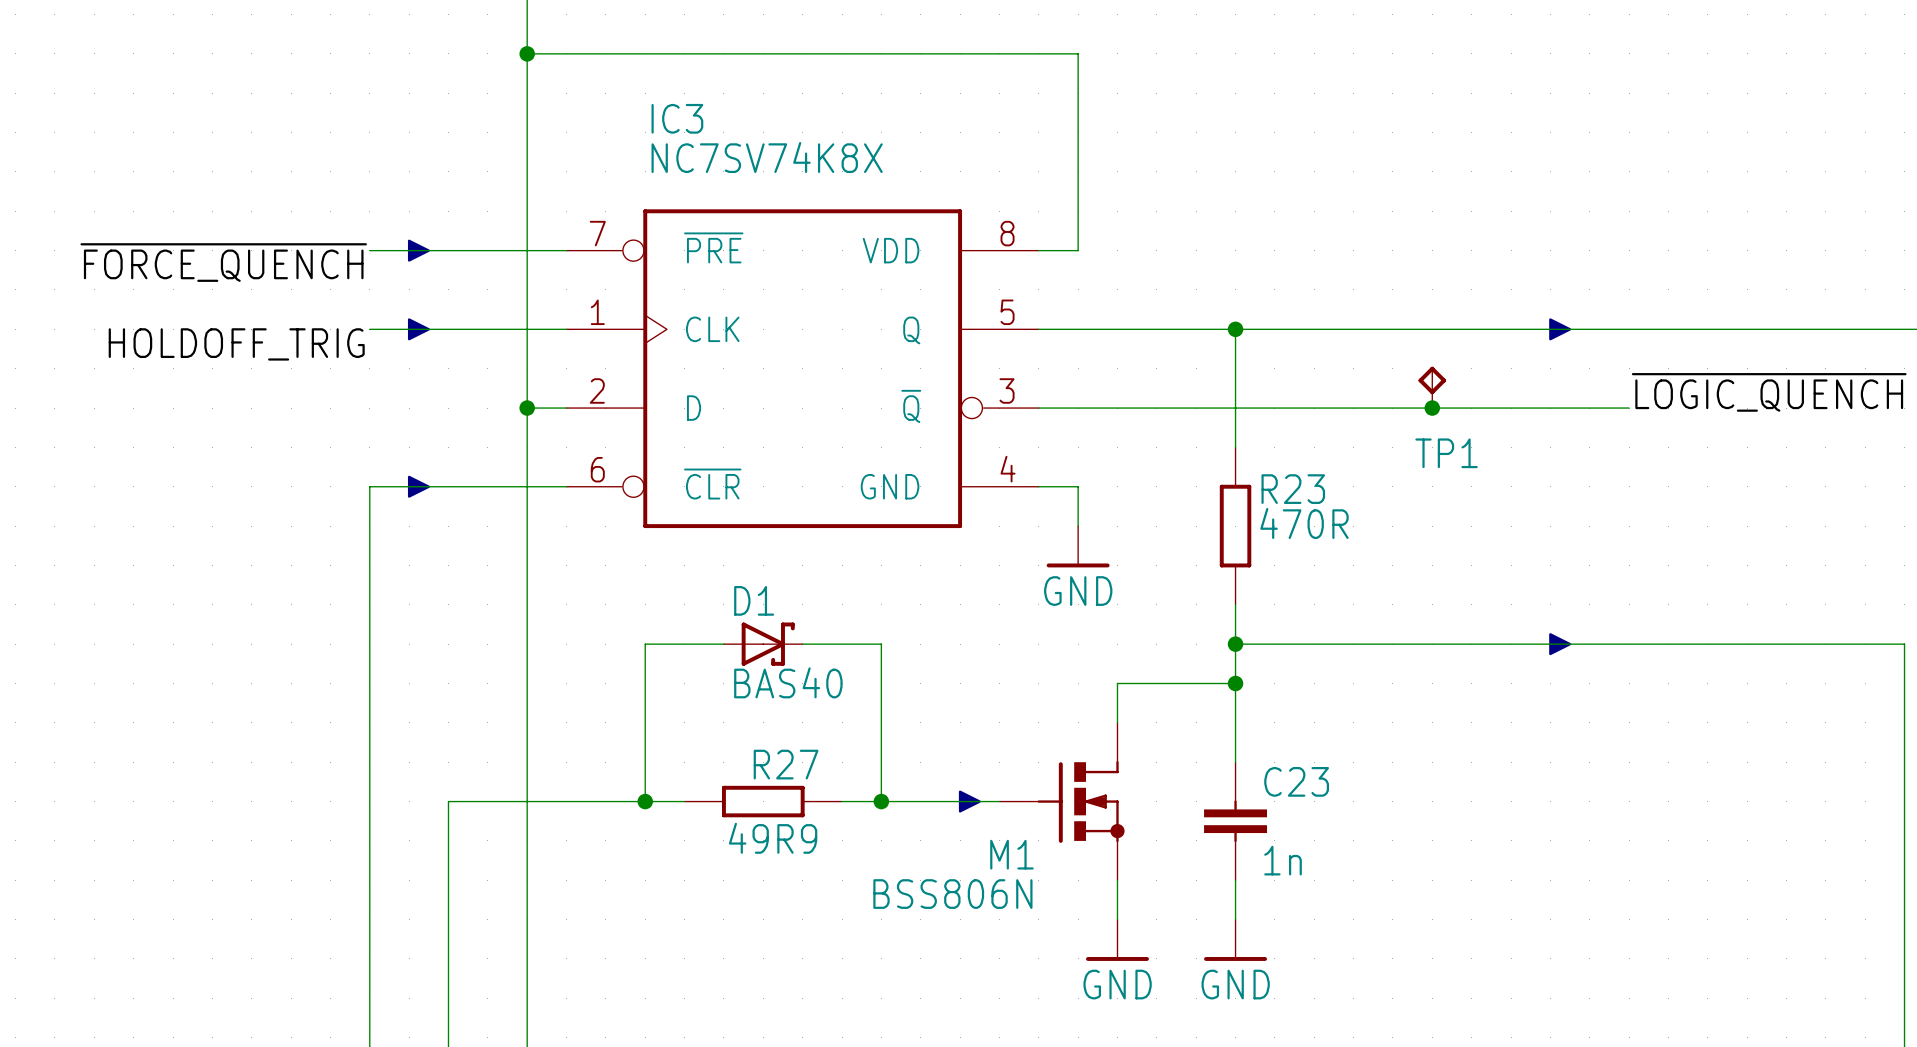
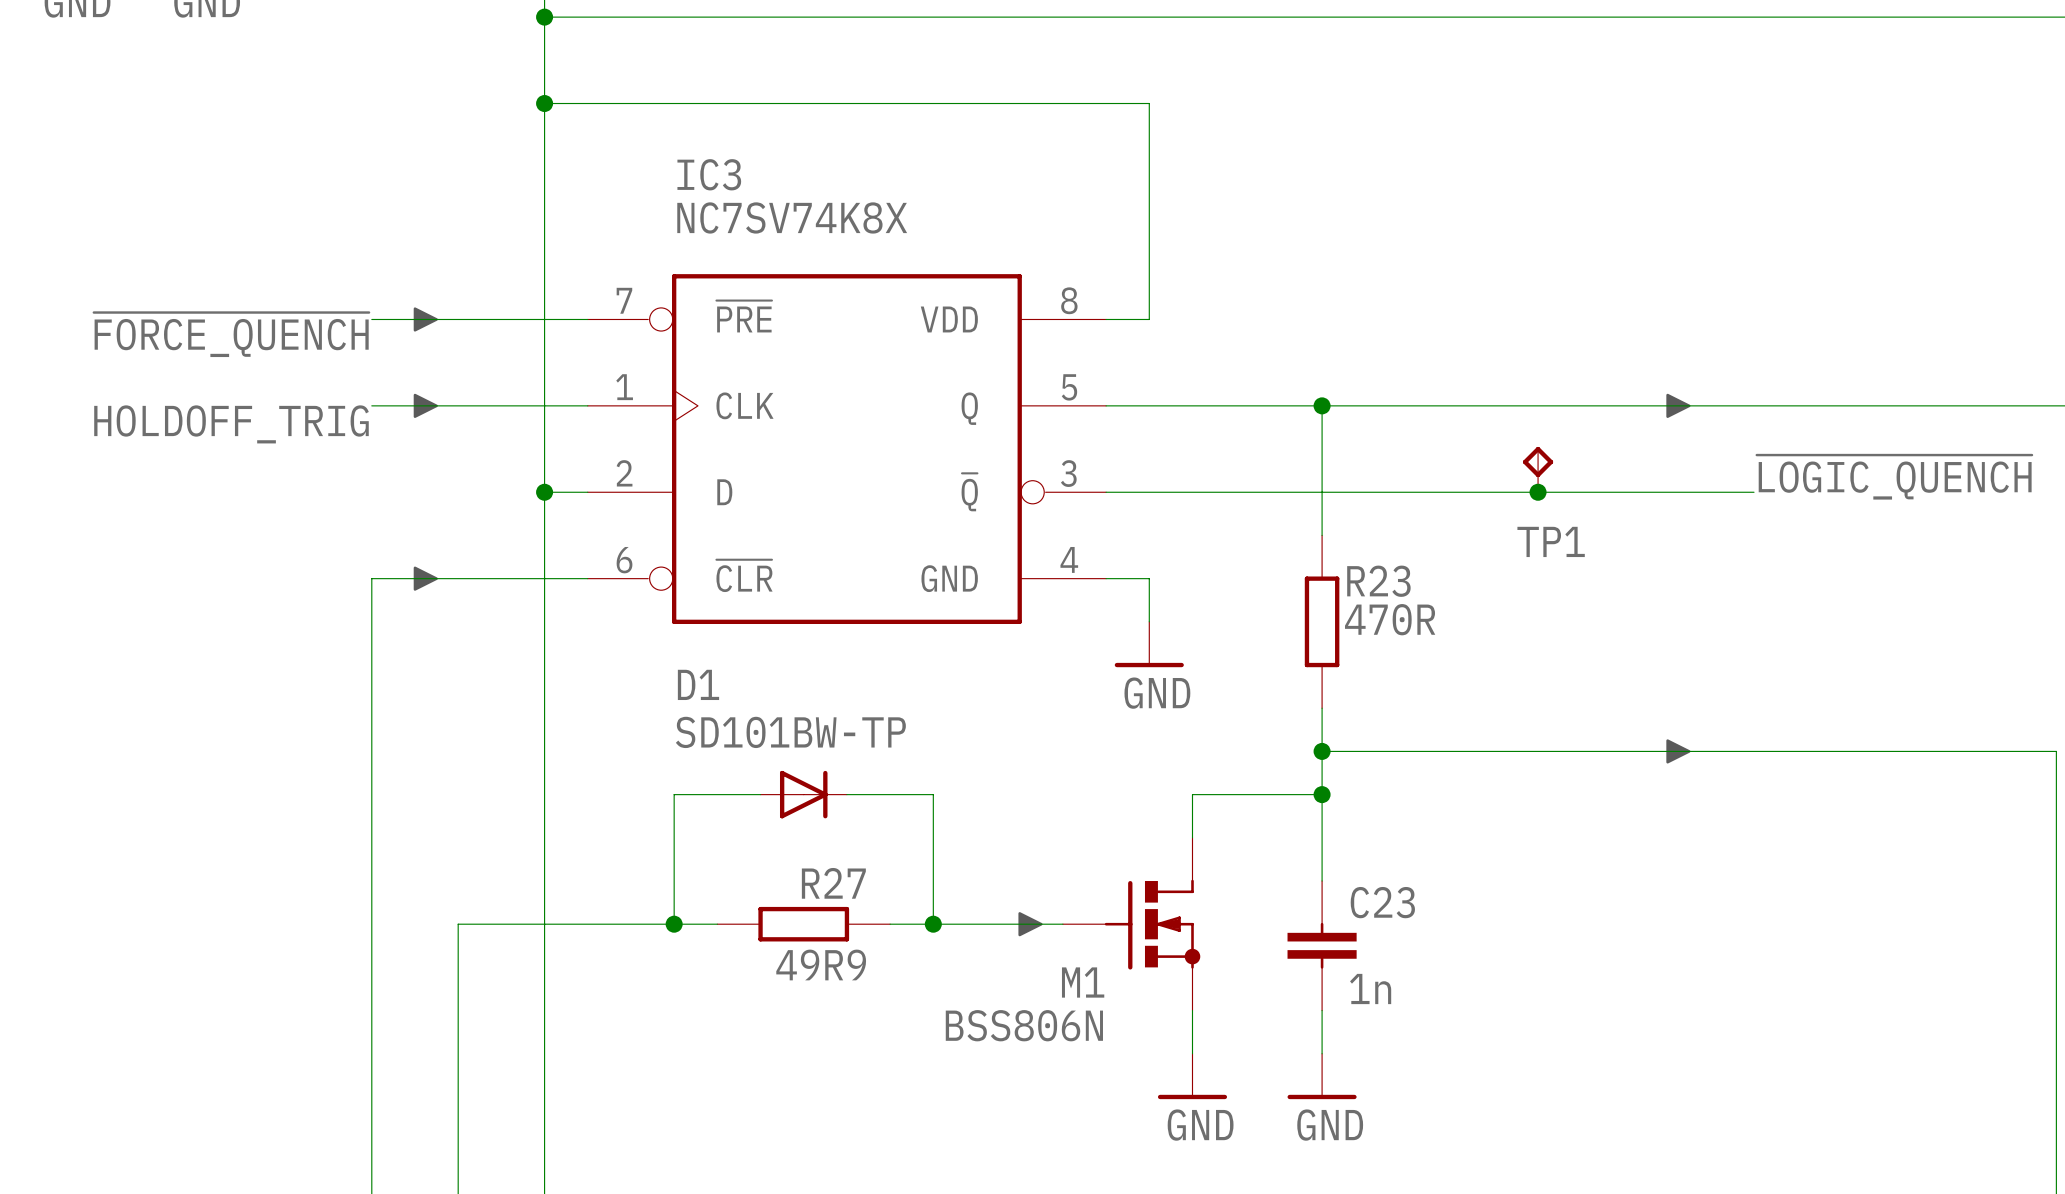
D1 name position: D1 (754, 600) -> D1 (698, 684)
D1 symbol: [723, 622, 803, 666] -> [760, 770, 847, 819]
wire: (723, 644) (645, 644) (645, 683) -> (760, 794) (674, 794)
wire: (802, 644) (881, 644) (881, 683) -> (846, 794) (933, 794)
D1 value: BAS40 (788, 682) -> SD101BW-TP (790, 732)

